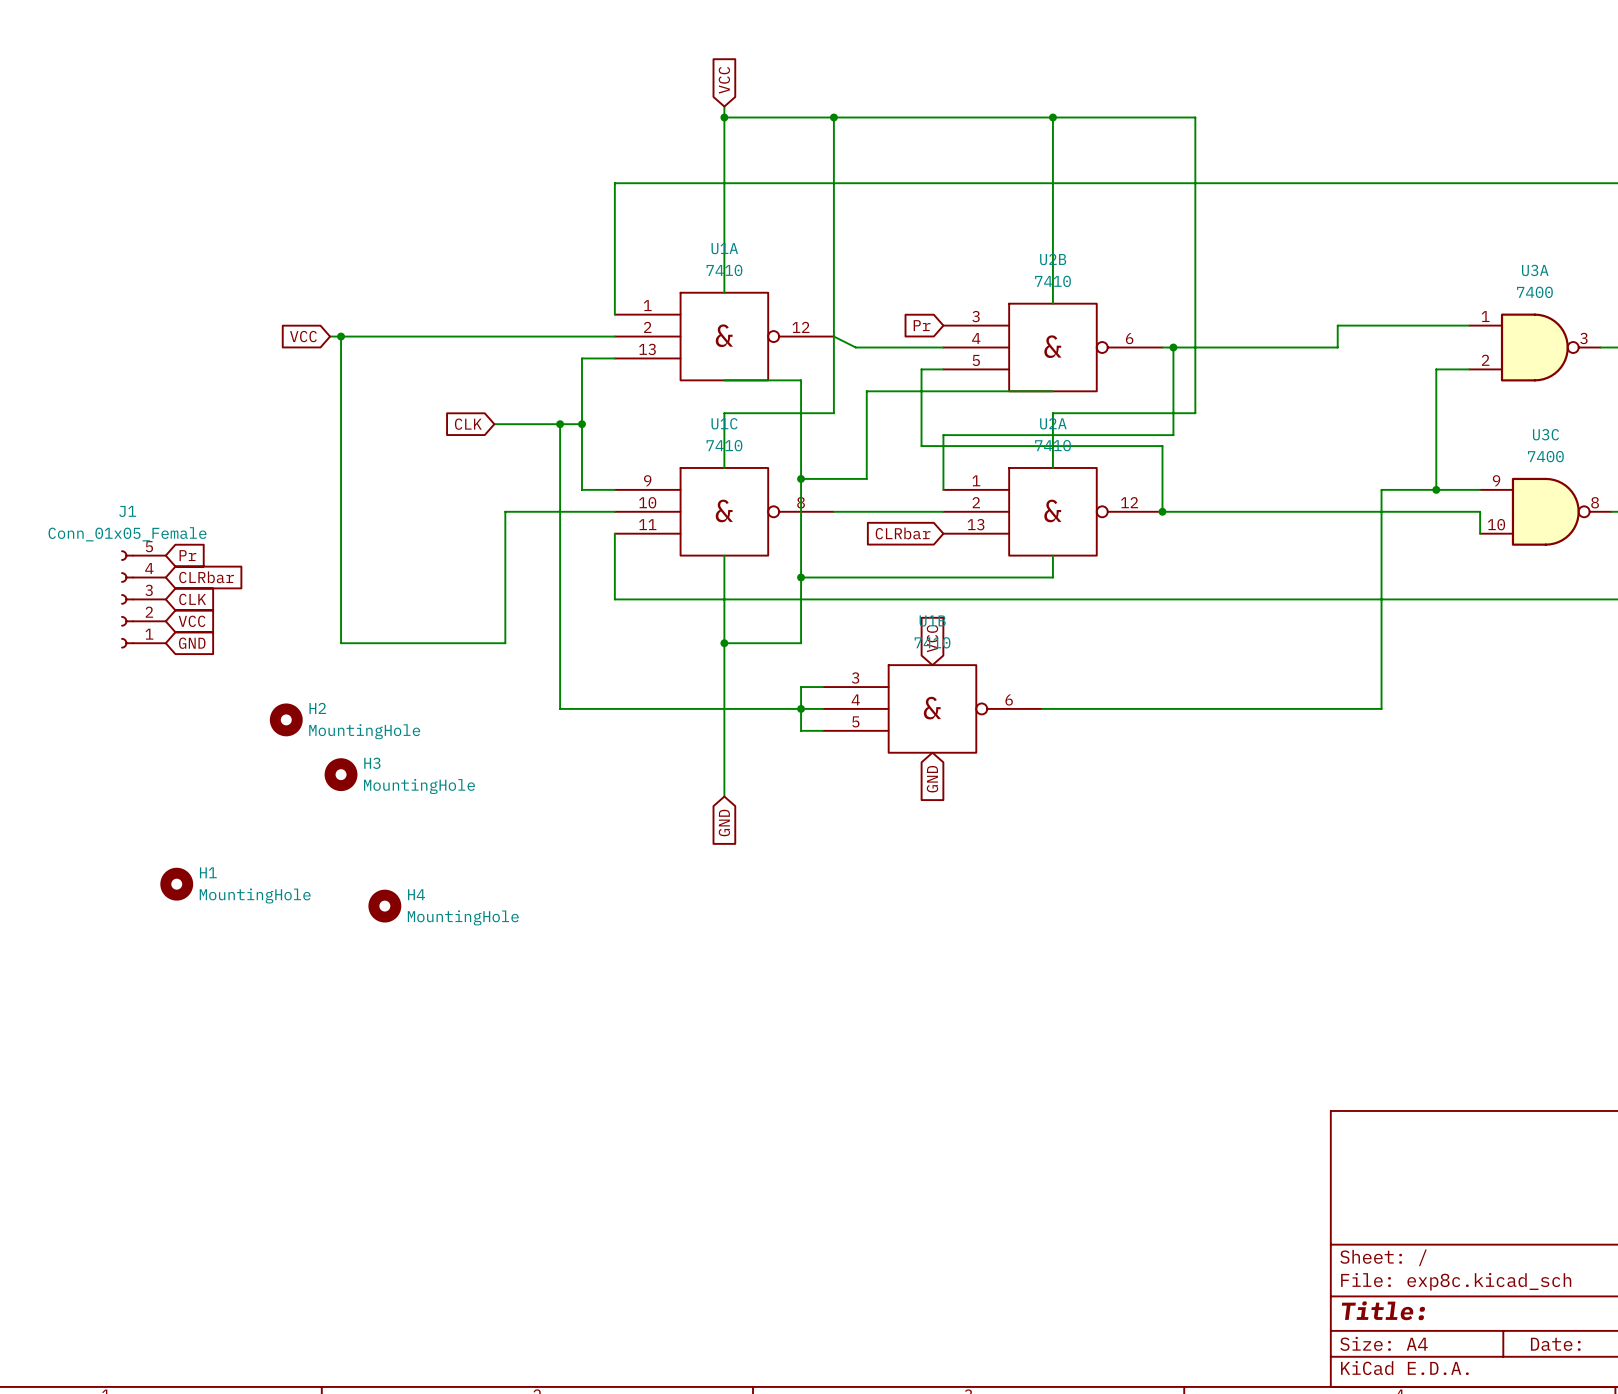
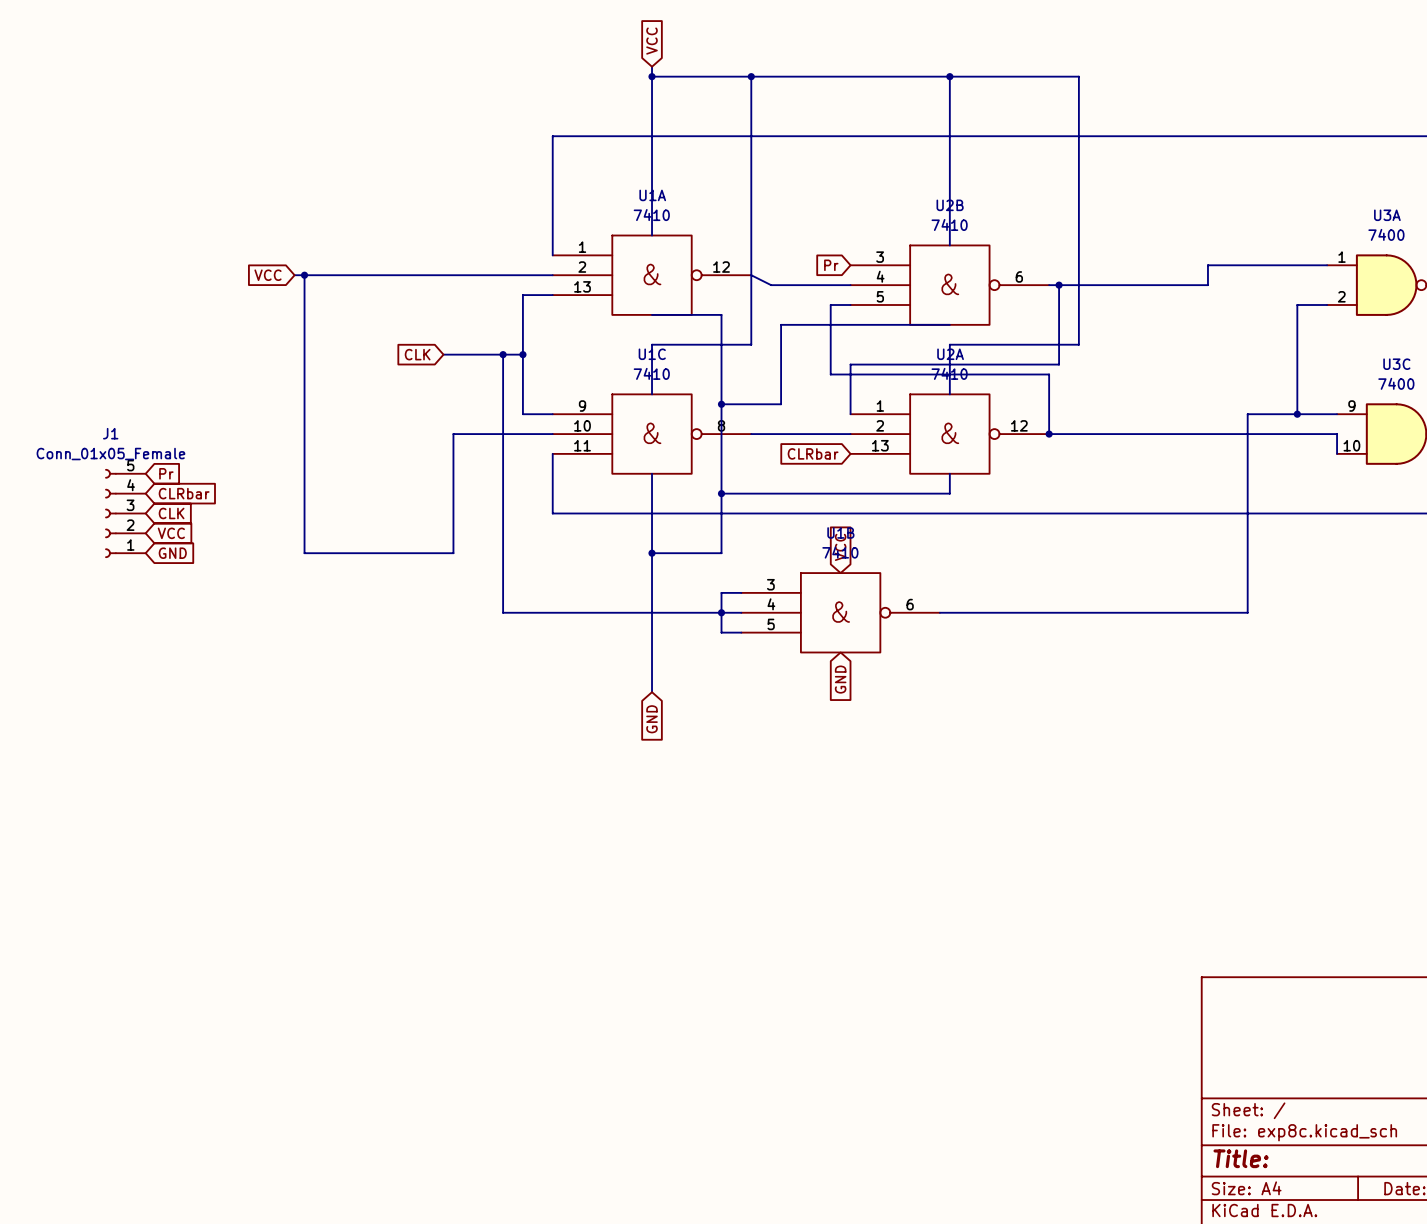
H2: MountingHole (286, 719) -> none
H3: MountingHole (341, 774) -> none
H1: MountingHole (176, 884) -> none
H4: MountingHole (384, 906) -> none

